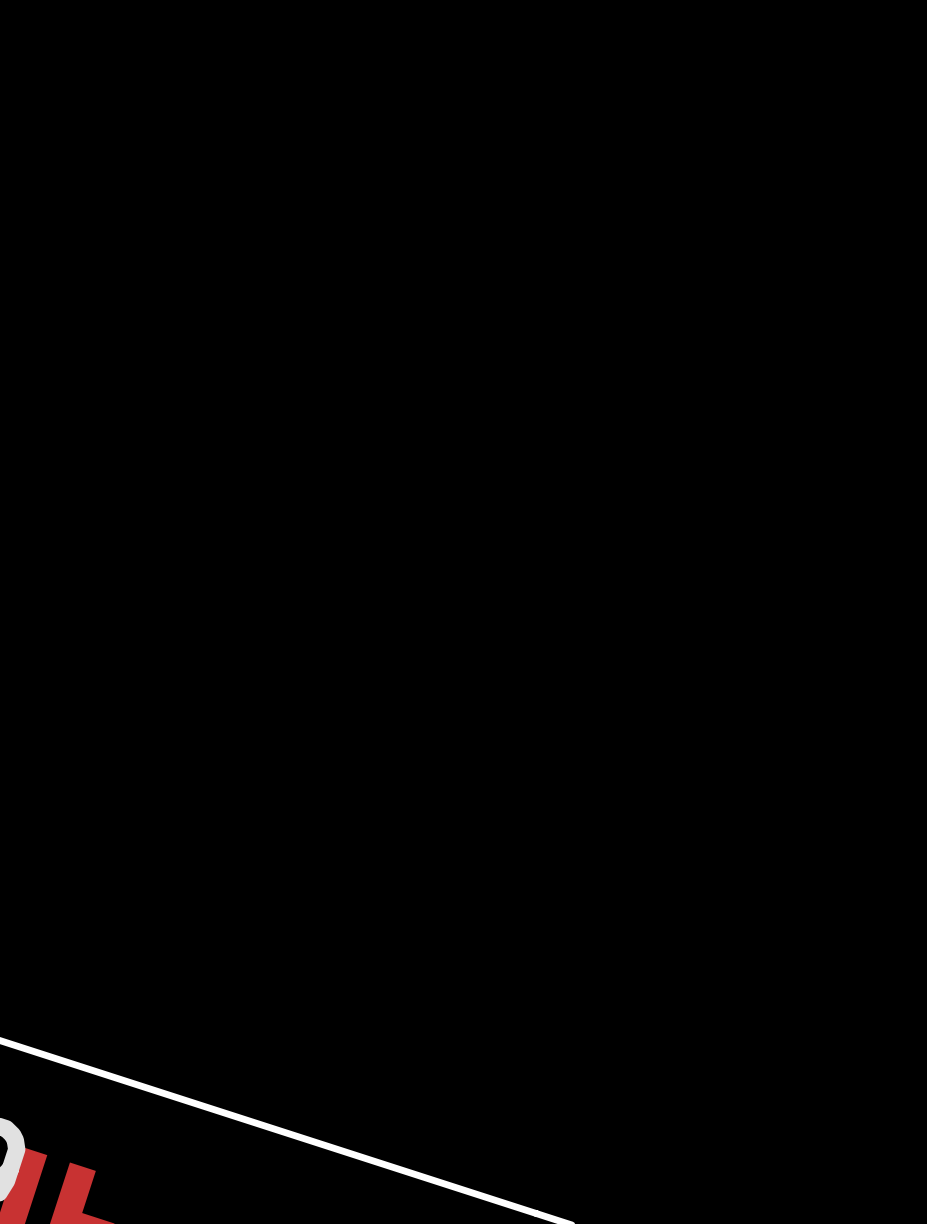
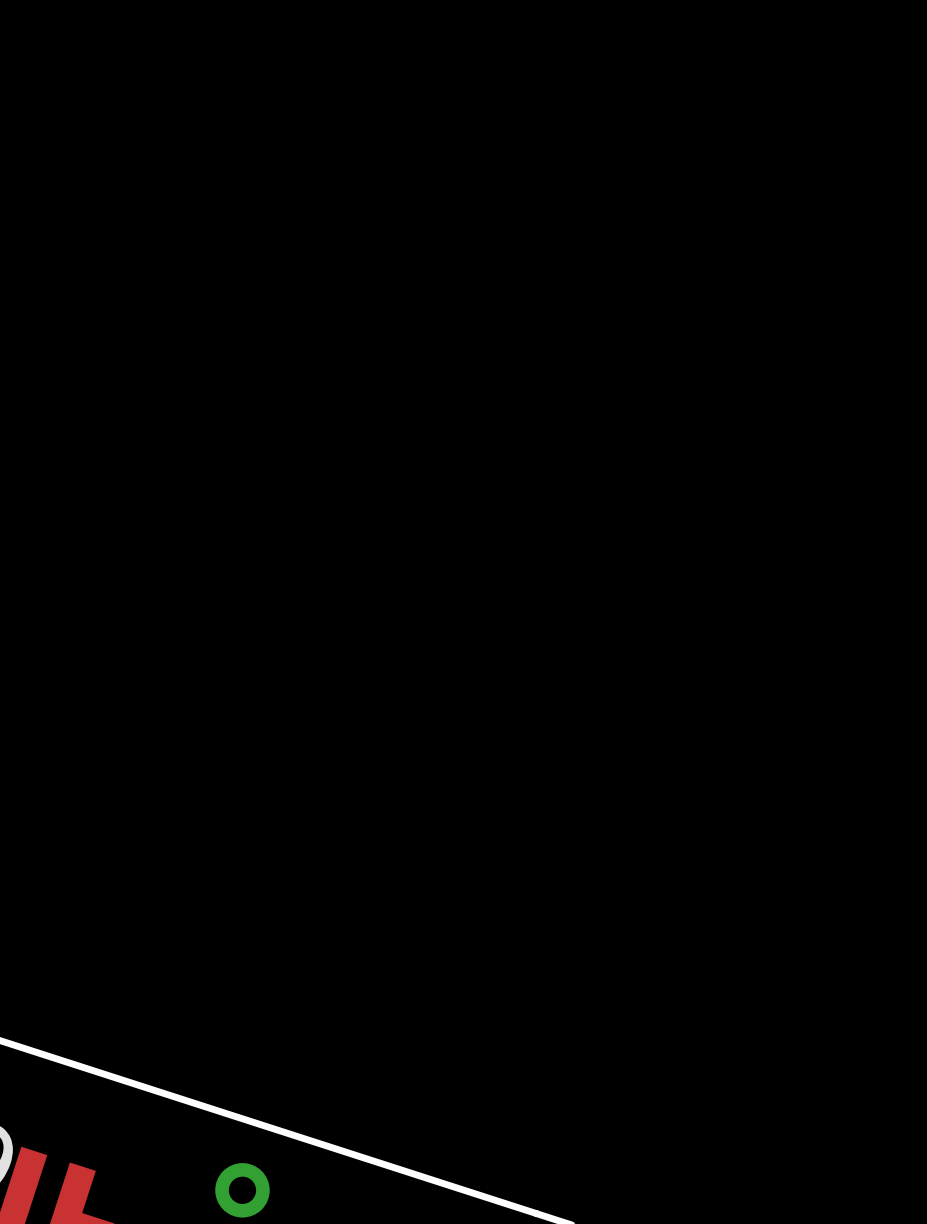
via: none -> (242, 1190)

